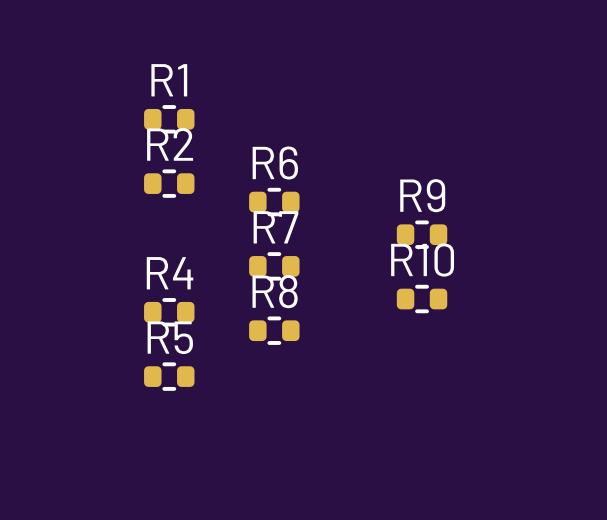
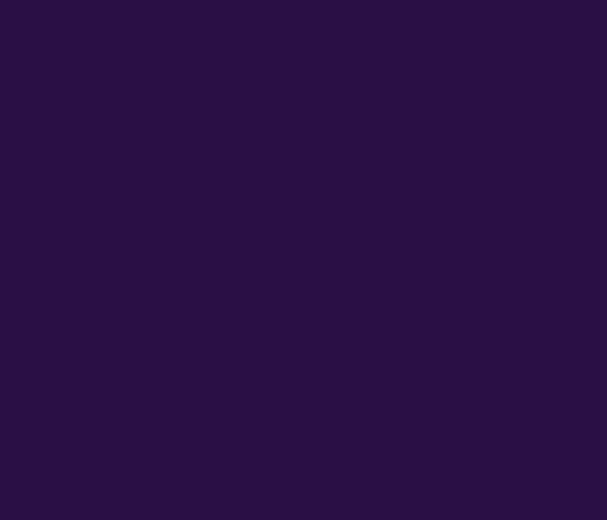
R1: (169, 119) -> none
R2: (169, 183) -> none
R6: (274, 202) -> none
R9: (422, 234) -> none
R7: (274, 266) -> none
R10: (422, 299) -> none
R4: (169, 312) -> none
R8: (274, 330) -> none
R5: (169, 376) -> none

